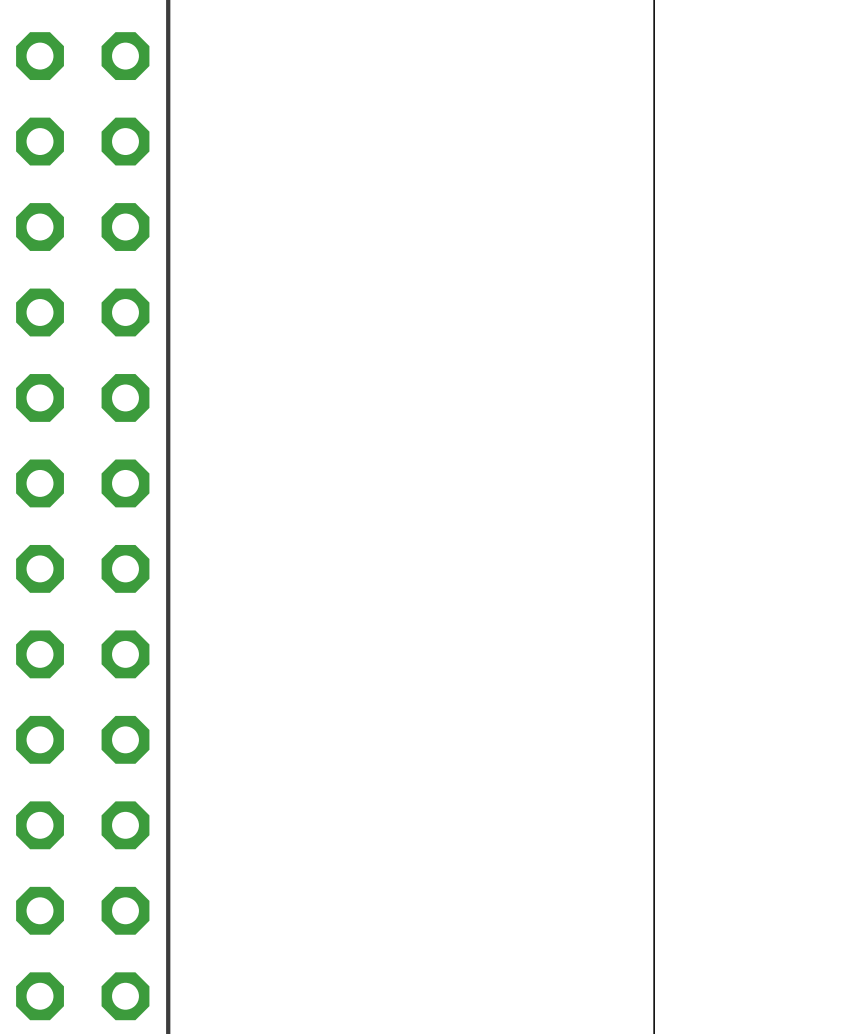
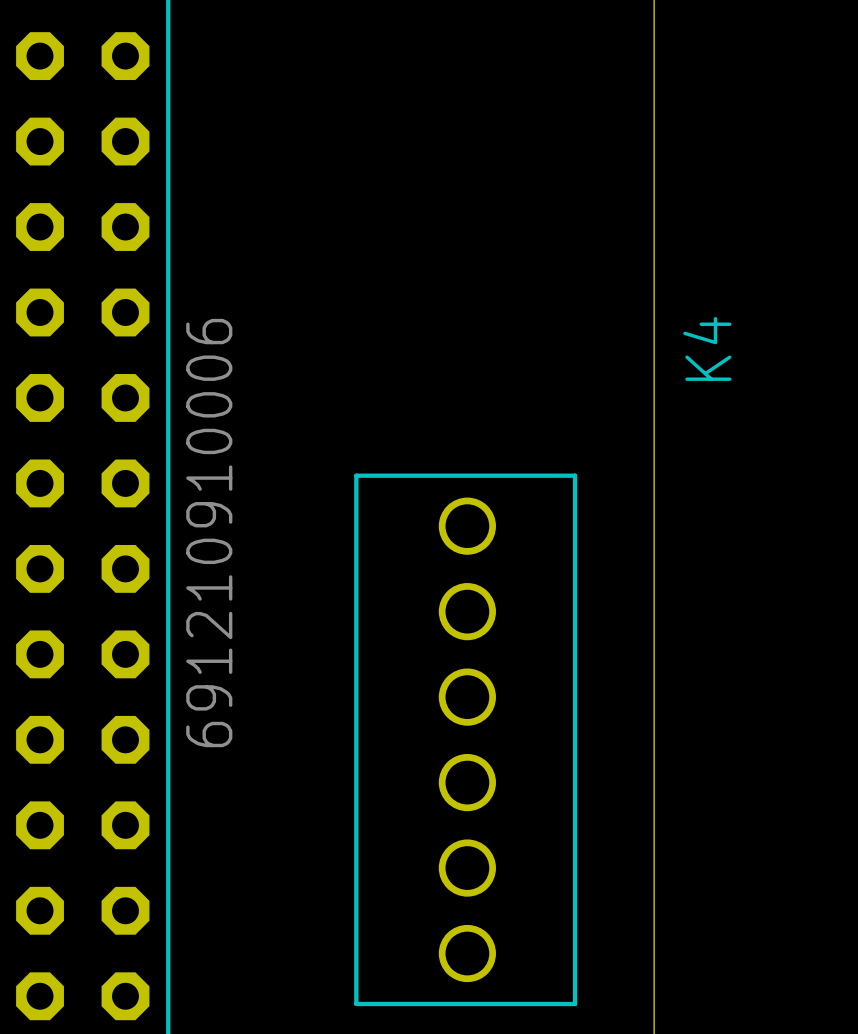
K4: none -> 691210910006 (465, 739)

